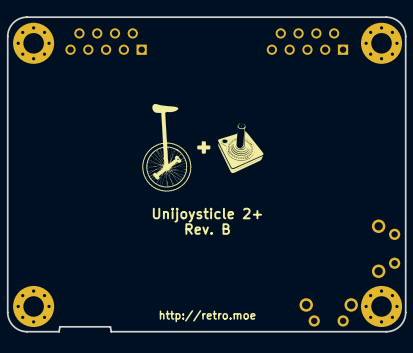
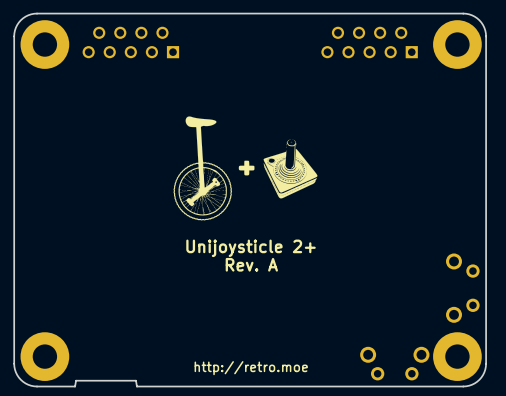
part footprint: [13, 22, 55, 64] -> [20, 20, 70, 69]
part footprint: [360, 22, 403, 64] -> [433, 20, 482, 69]
text: Rev. B (207, 229) -> Rev. A (251, 264)
part footprint: [13, 285, 55, 328] -> [20, 332, 70, 381]
part footprint: [360, 285, 403, 328] -> [433, 332, 482, 381]

